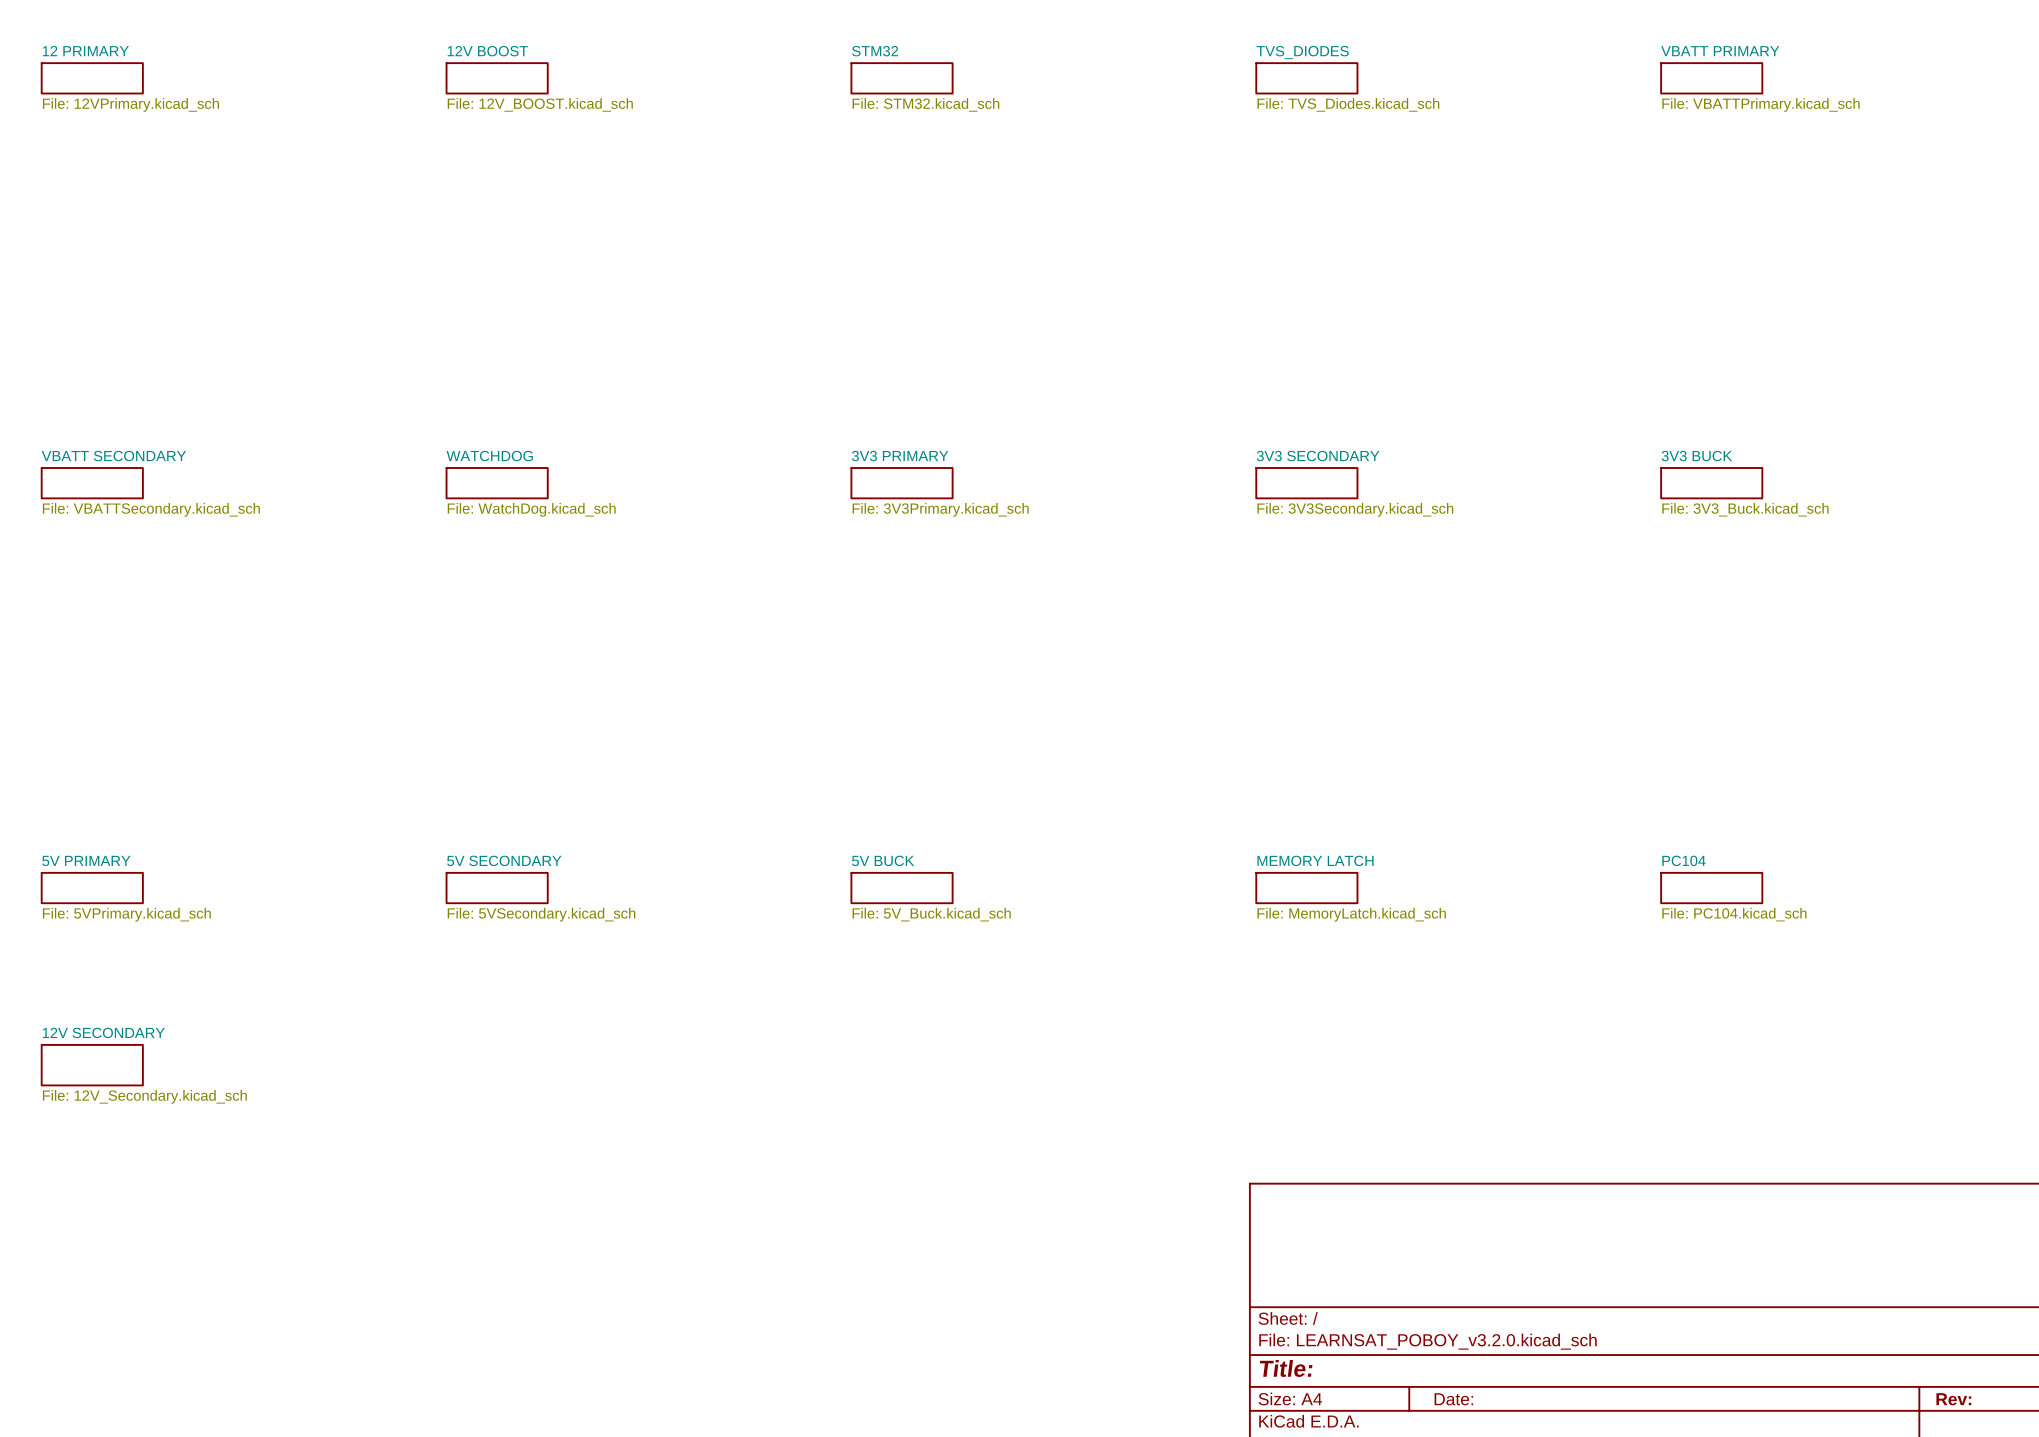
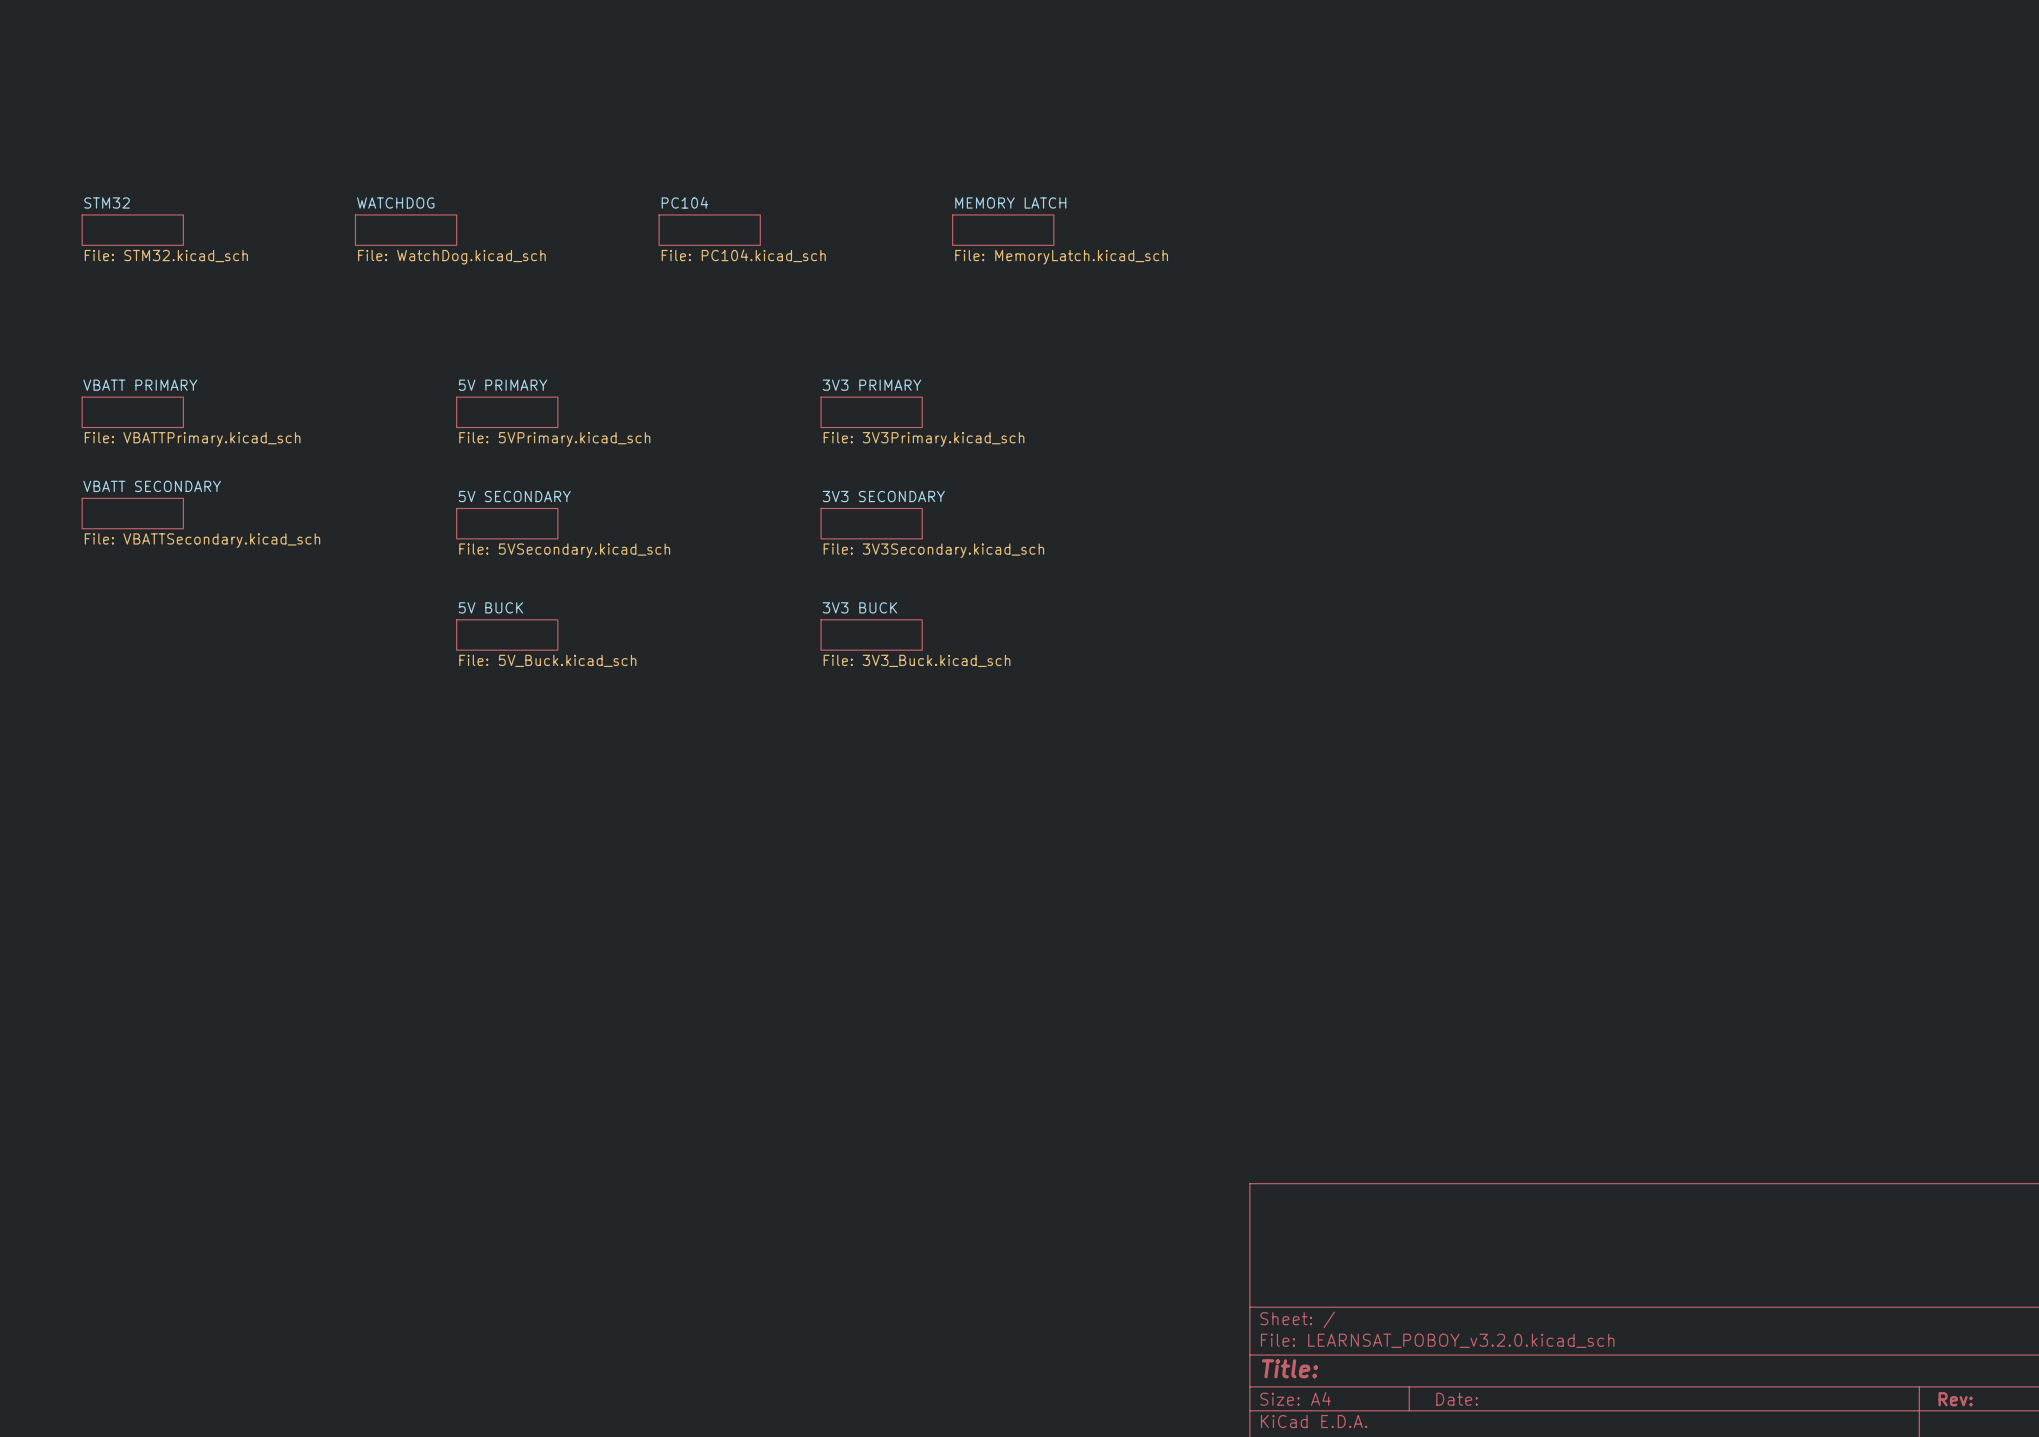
sheet 12 PRIMARY: File: 12VPrimary.kicad_sch (92, 78) -> none
sheet 12V BOOST: File: 12V_BOOST.kicad_sch (497, 78) -> none
sheet STM32 position: (902, 78) -> (132, 230)
sheet TVS_DIODES: File: TVS_Diodes.kicad_sch (1306, 78) -> none
sheet VBATT PRIMARY: File: VBATTPrimary.kicad_sch (1711, 78) -> none
sheet WATCHDOG: none -> File: WatchDog.kicad_sch (406, 230)
sheet MEMORY LATCH: none -> File: MemoryLatch.kicad_sch (1003, 230)
sheet VBATT PRIMARY: none -> File: VBATTPrimary.kicad_sch (132, 412)
sheet VBATT SECONDARY position: (92, 483) -> (132, 513)
sheet WATCHDOG: File: WatchDog.kicad_sch (497, 483) -> none
sheet 3V3 PRIMARY position: (902, 483) -> (871, 412)
sheet 3V3 SECONDARY position: (1306, 483) -> (871, 523)
sheet 3V3 BUCK position: (1711, 483) -> (871, 635)
sheet 5V PRIMARY position: (92, 888) -> (507, 412)
sheet 5V SECONDARY position: (497, 888) -> (507, 523)
sheet 5V BUCK position: (902, 888) -> (507, 635)
sheet MEMORY LATCH: File: MemoryLatch.kicad_sch (1306, 888) -> none
sheet PC104 position: (1711, 888) -> (709, 230)
sheet 12V SECONDARY: File: 12V_Secondary.kicad_sch (92, 1065) -> none

